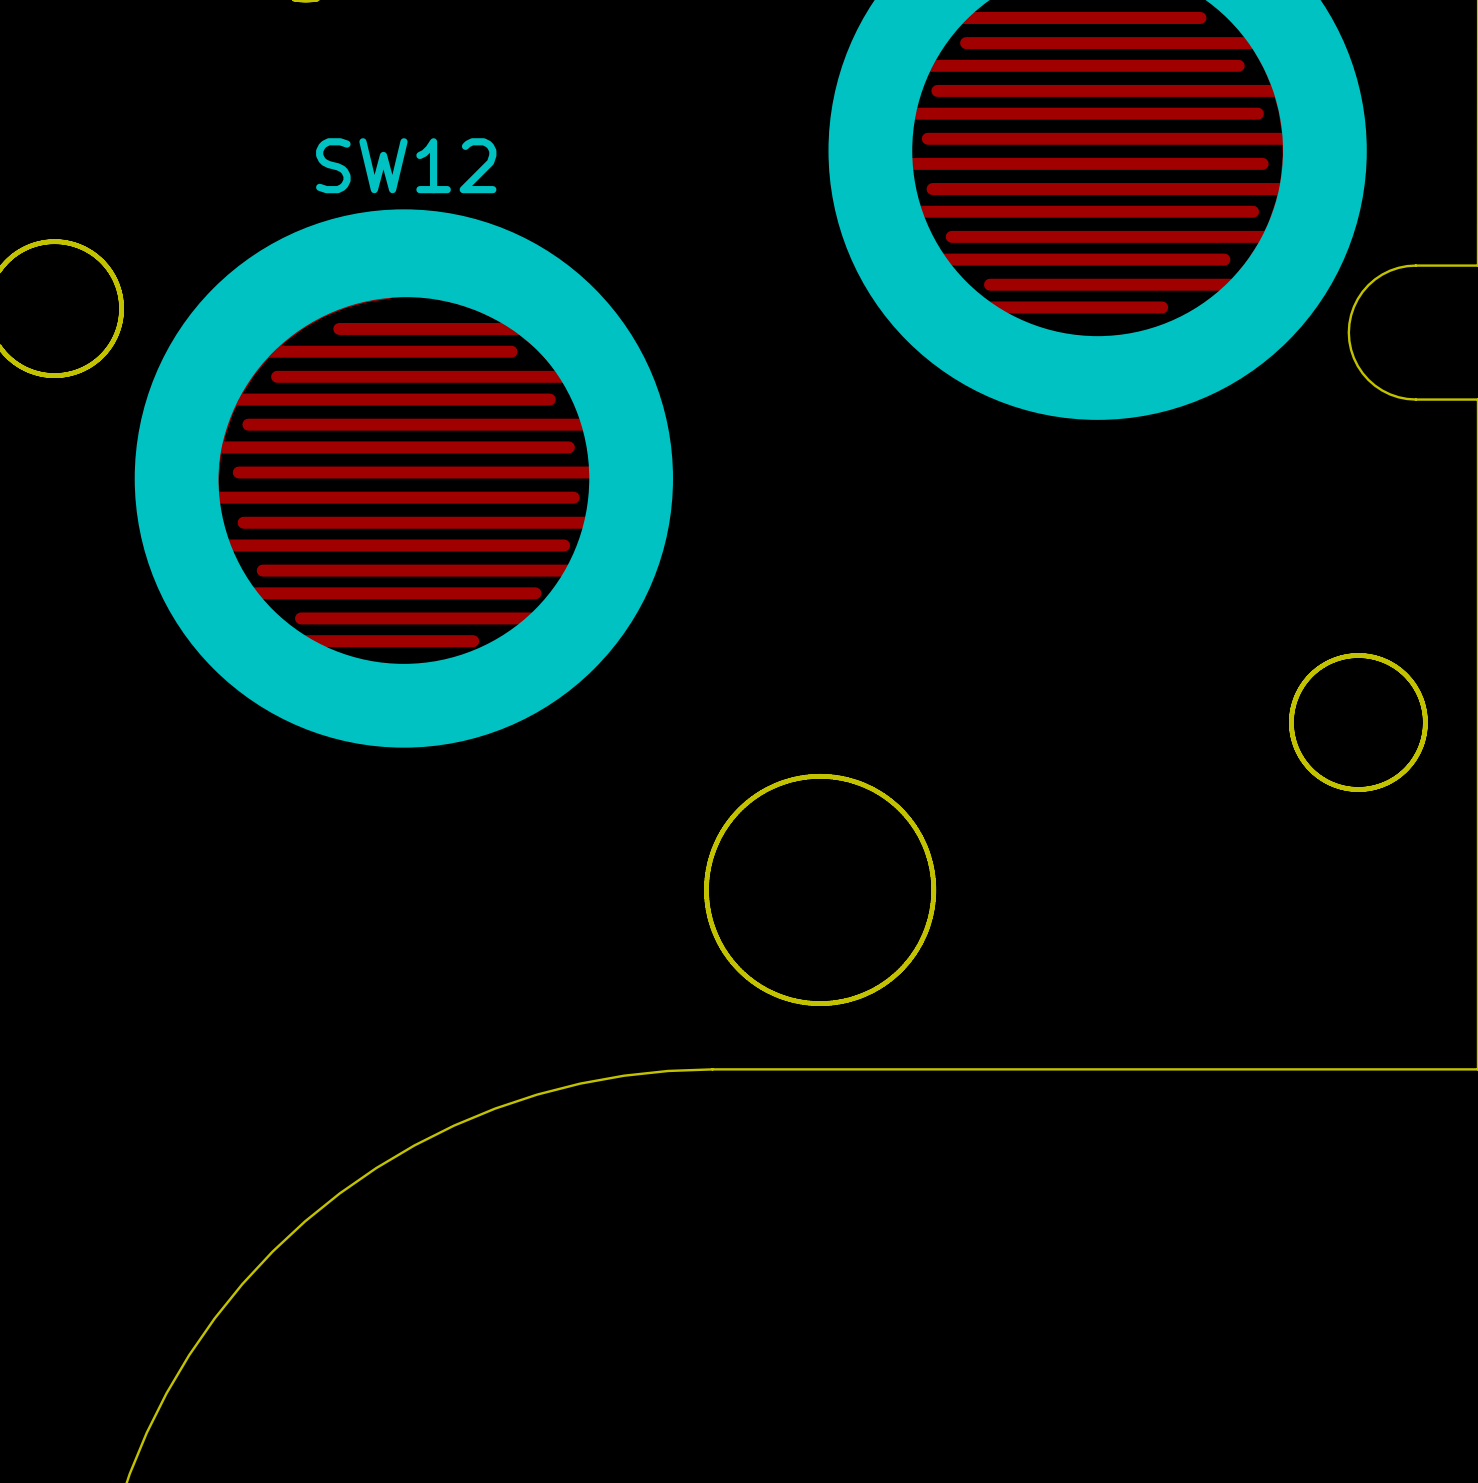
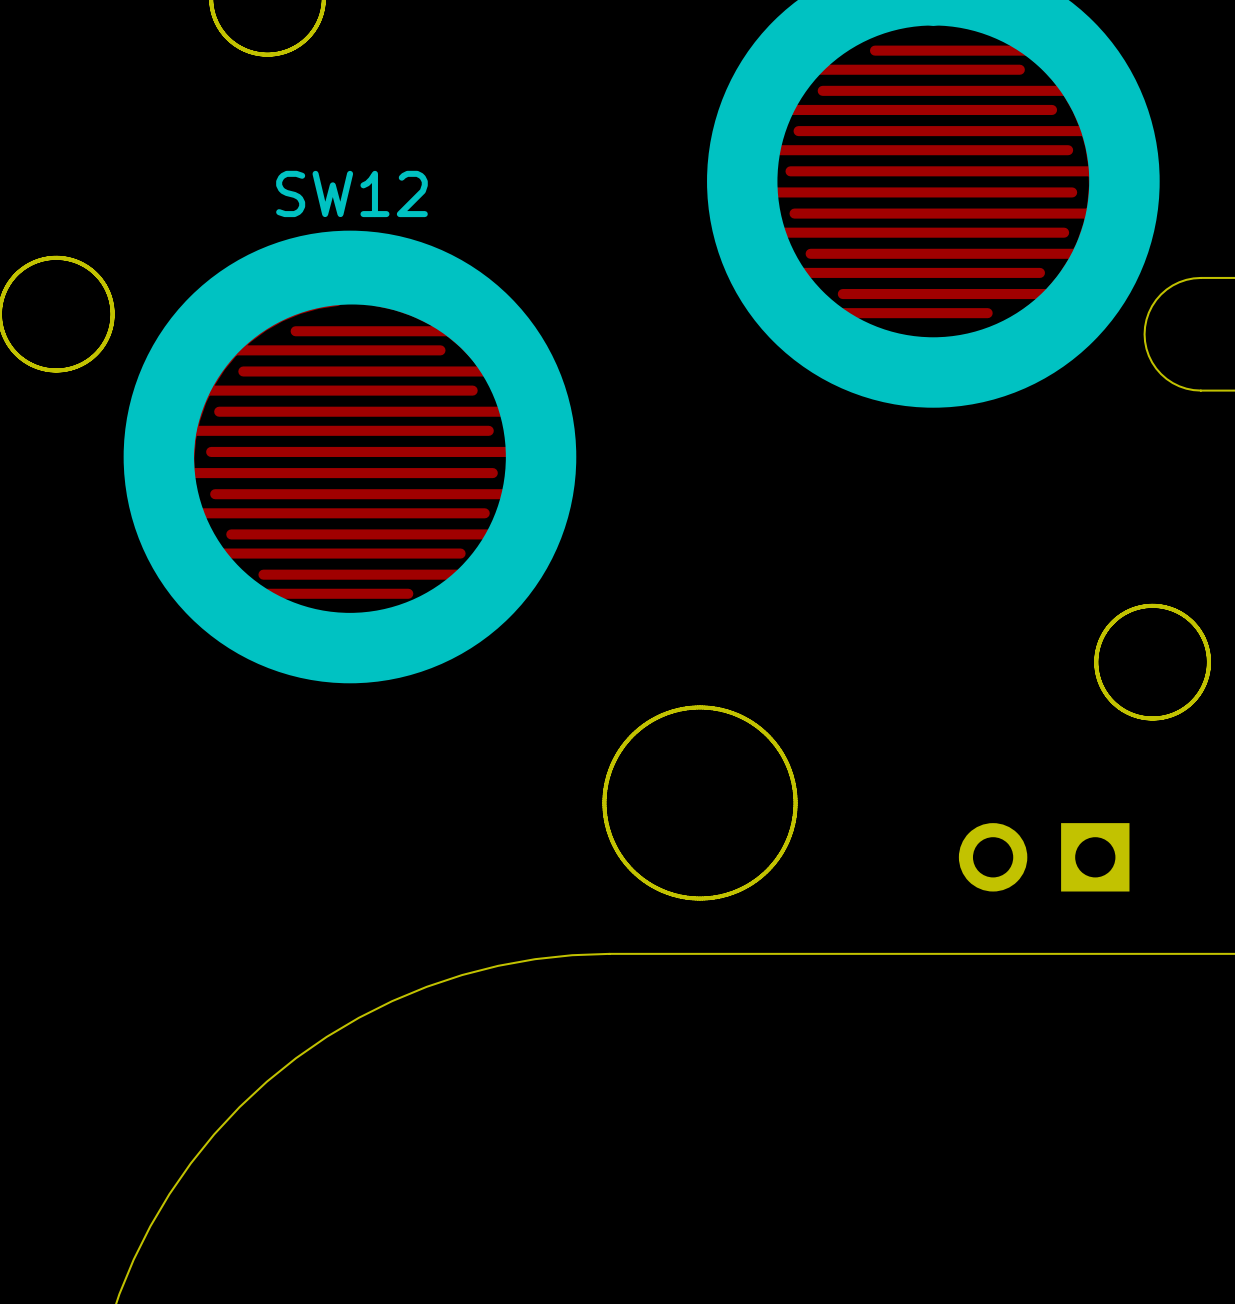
part: none -> (1044, 857)

